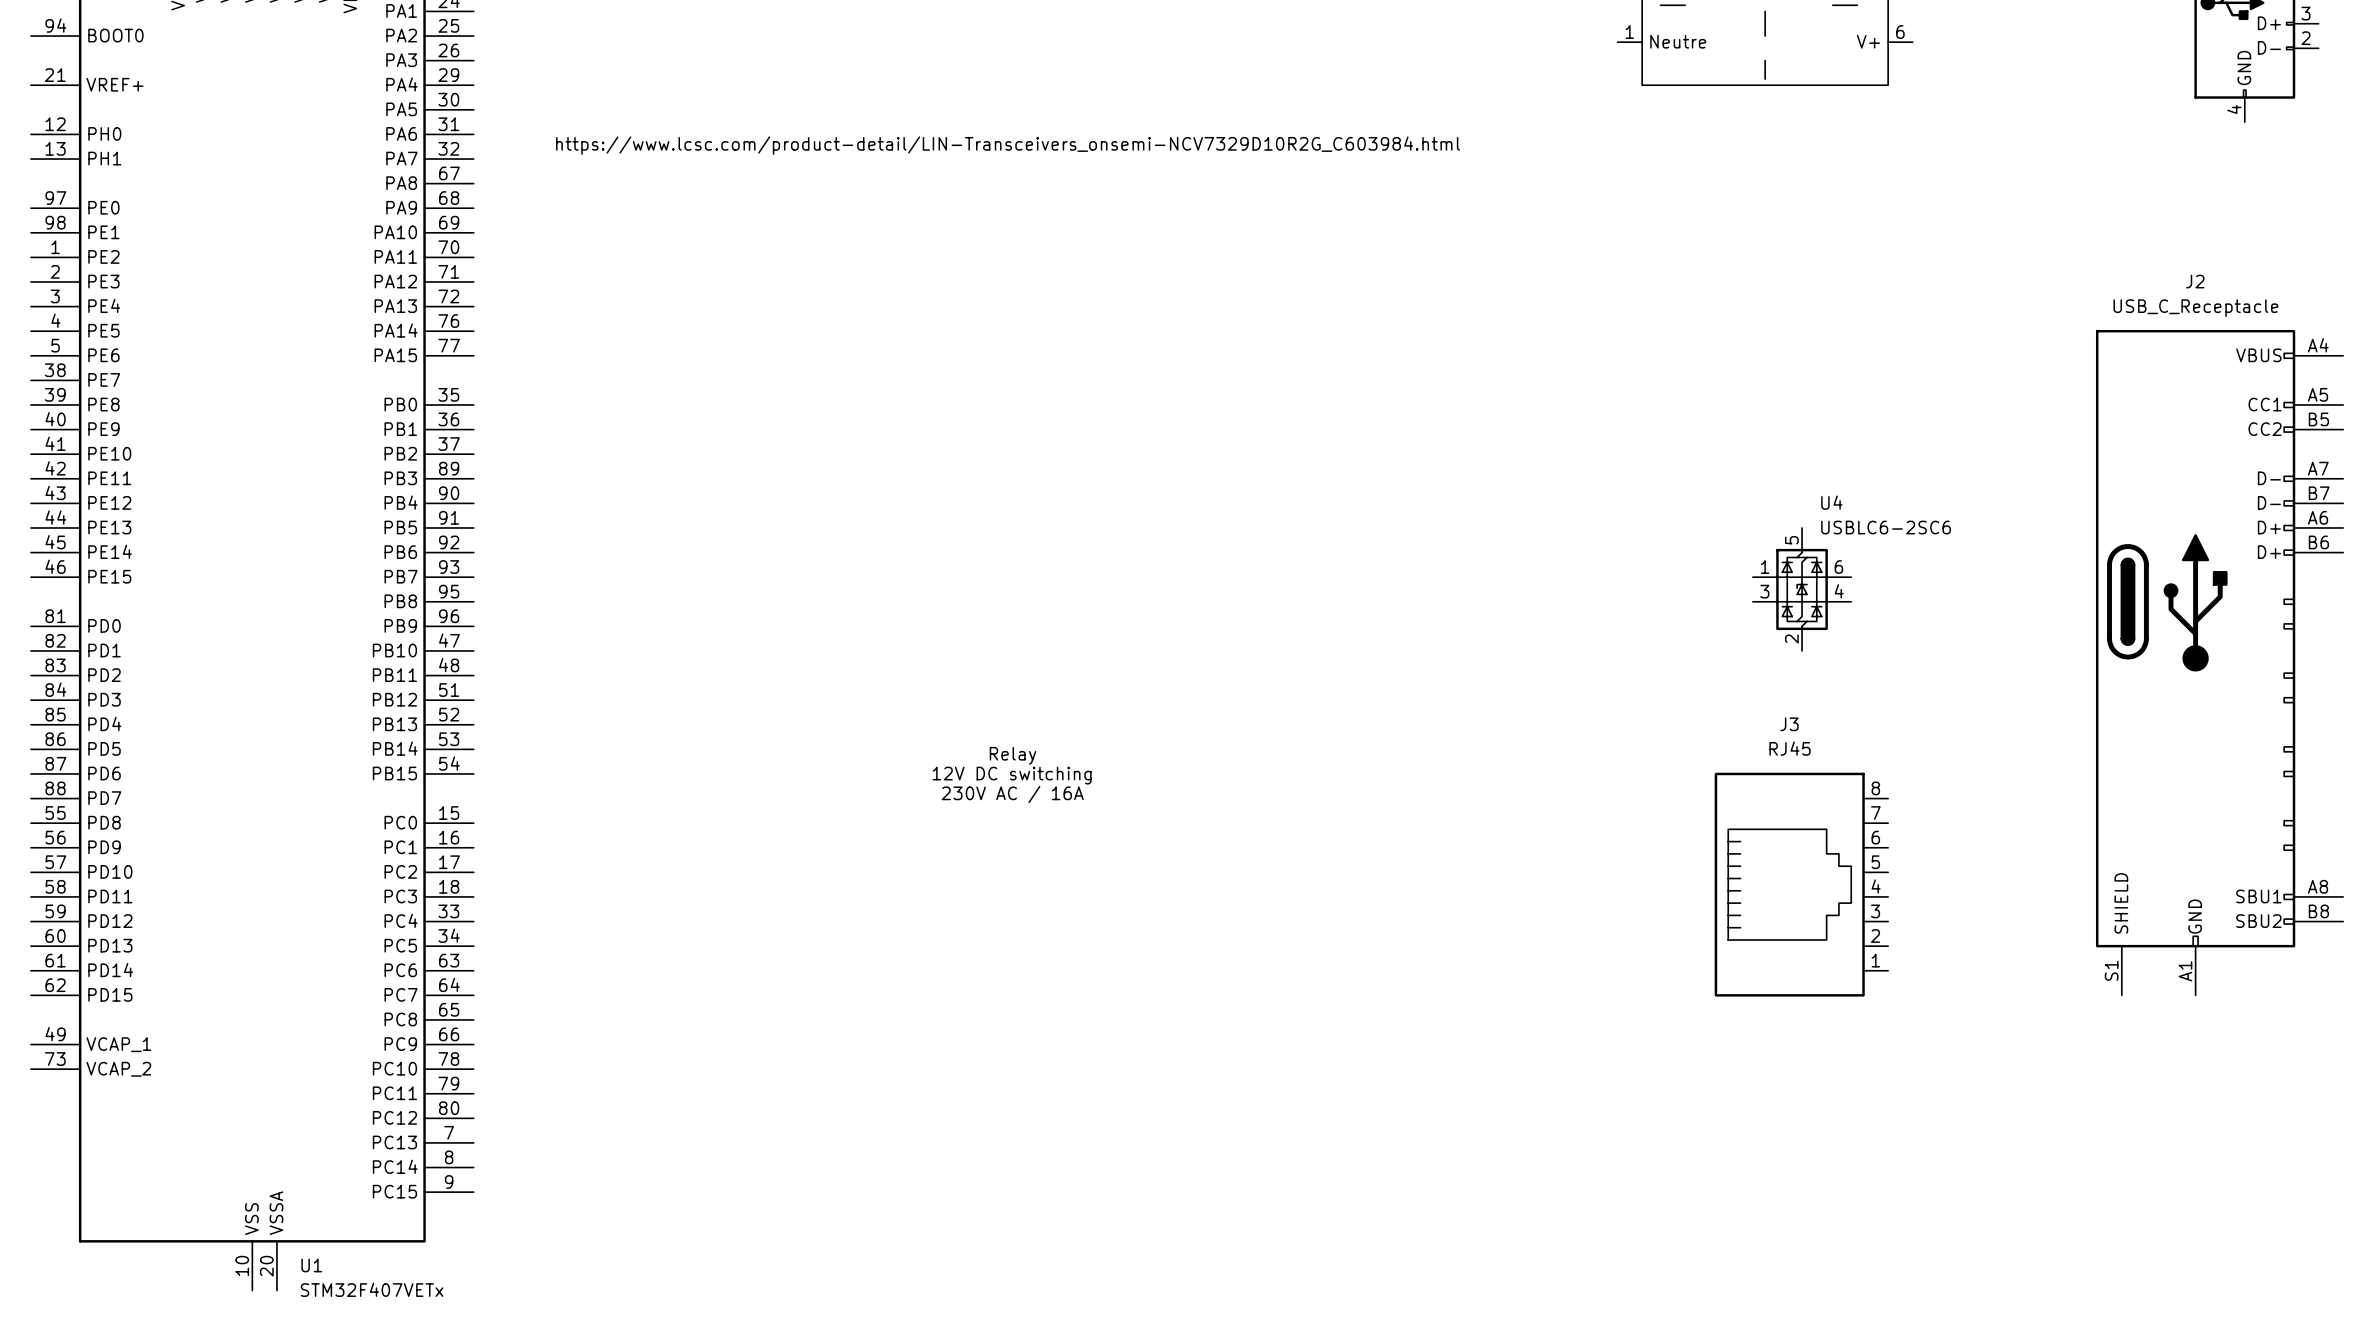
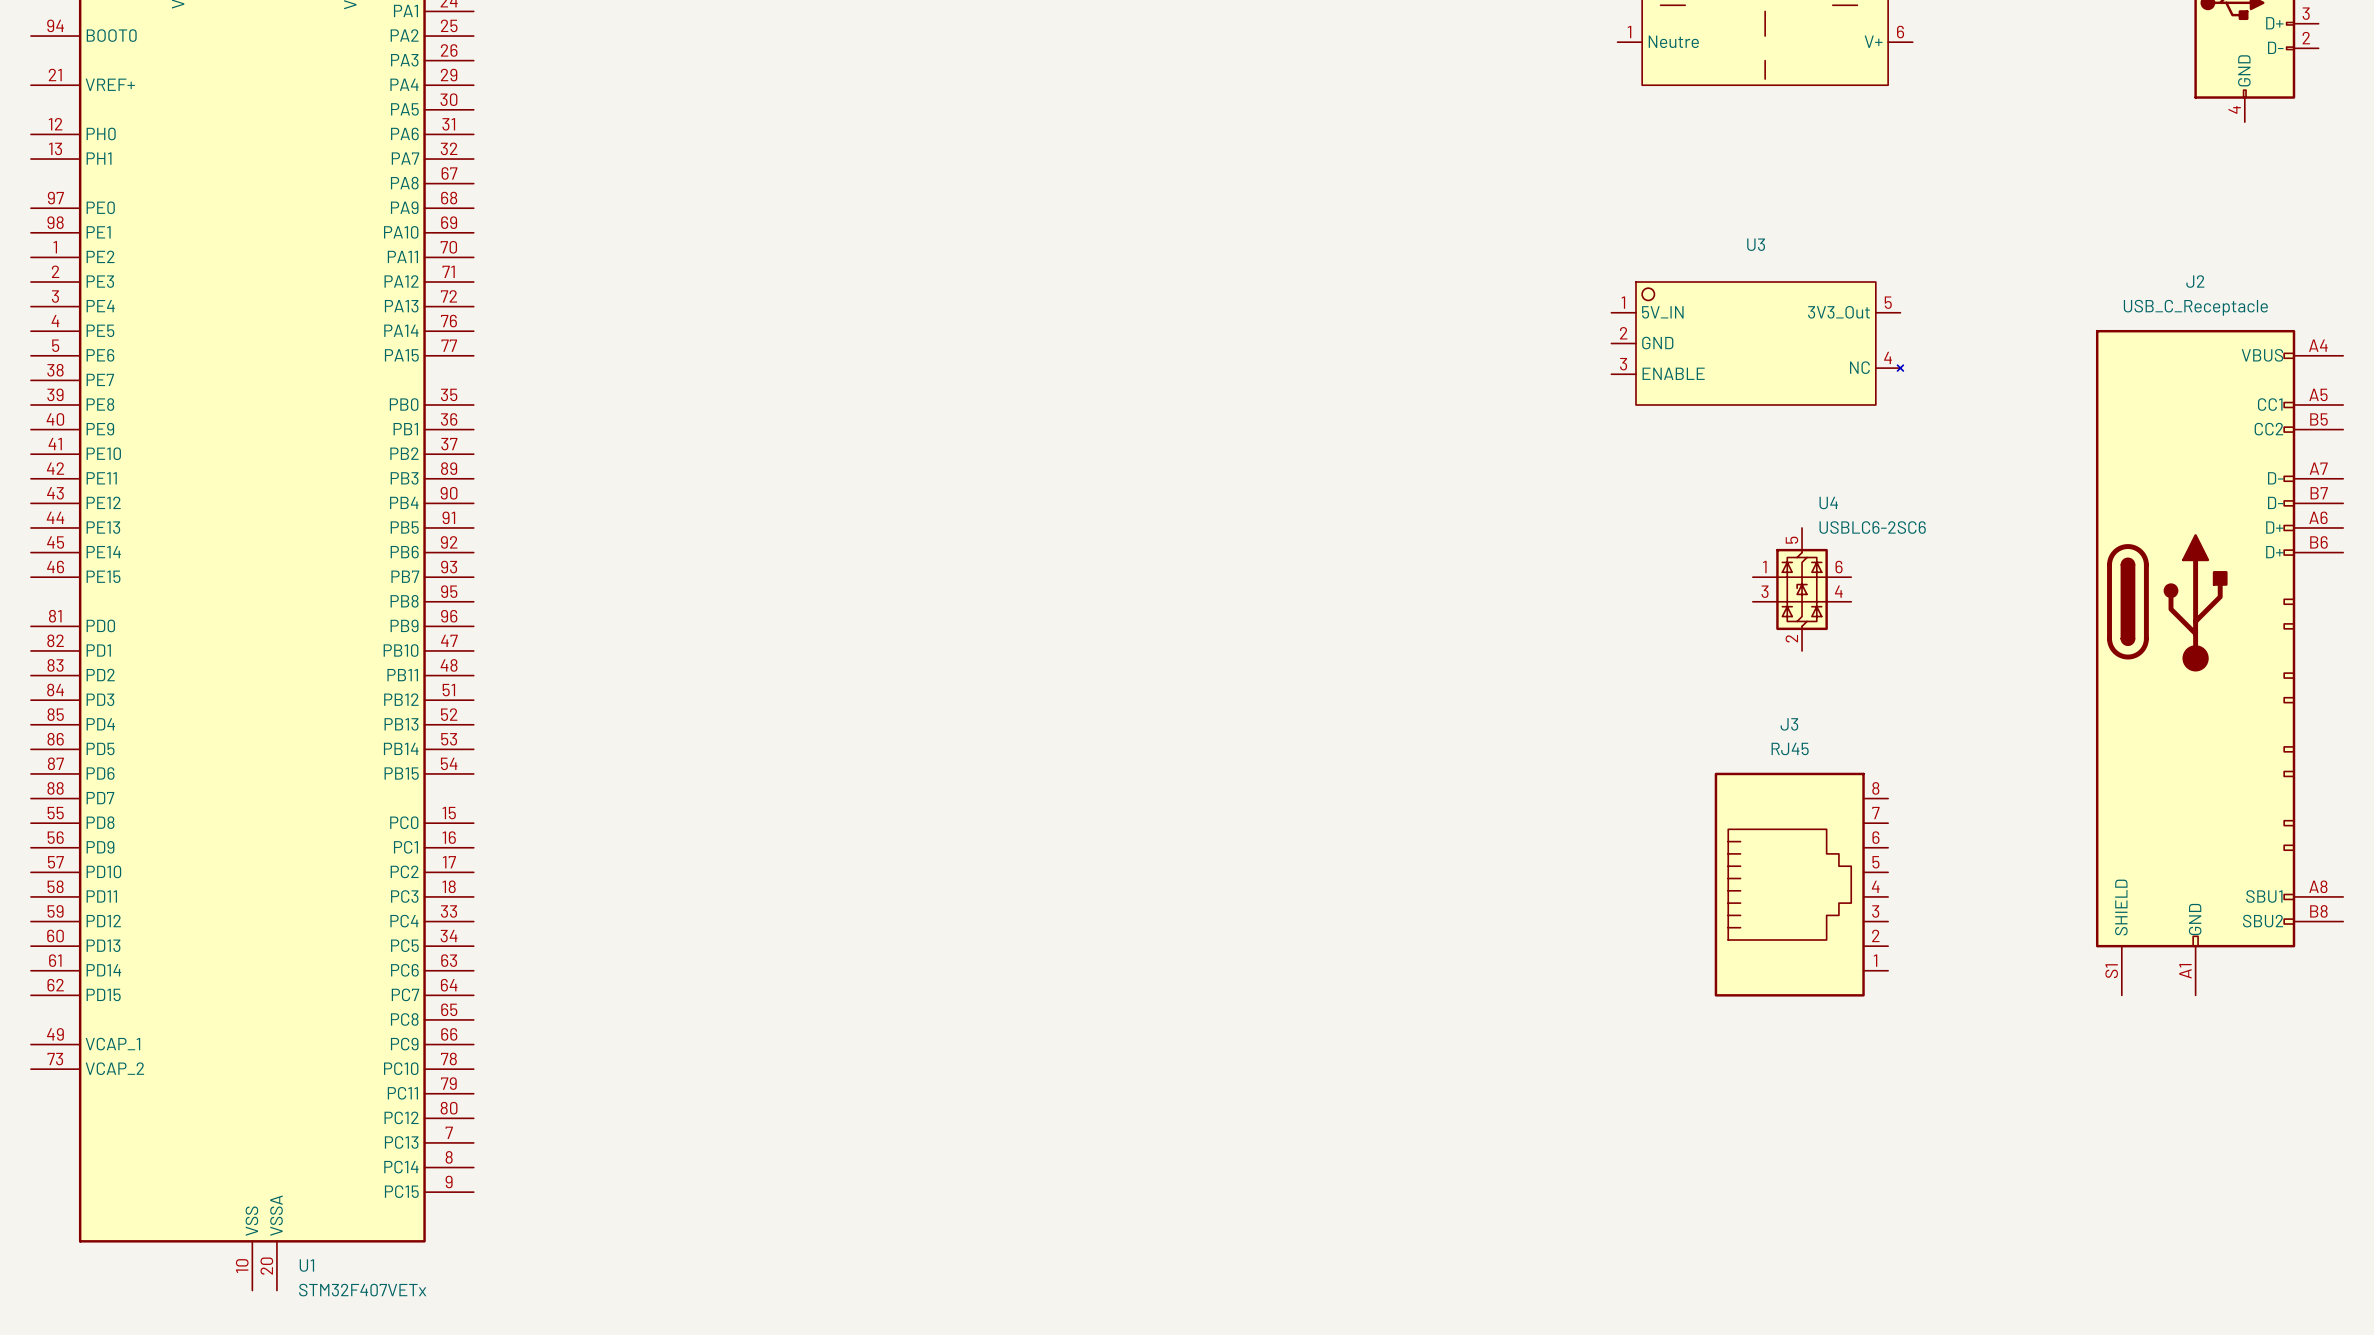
text: https://www.lcsc.com/product-detail/LIN-Transceivers_onsemi-NCV7329D10R2G_C603984.html (1008, 145) -> none
U3: none -> (1757, 343)
text: Relay (1013, 755) -> none
text: 12V DC switching (1012, 775) -> none
text: 230V AC / 16A (1012, 794) -> none

